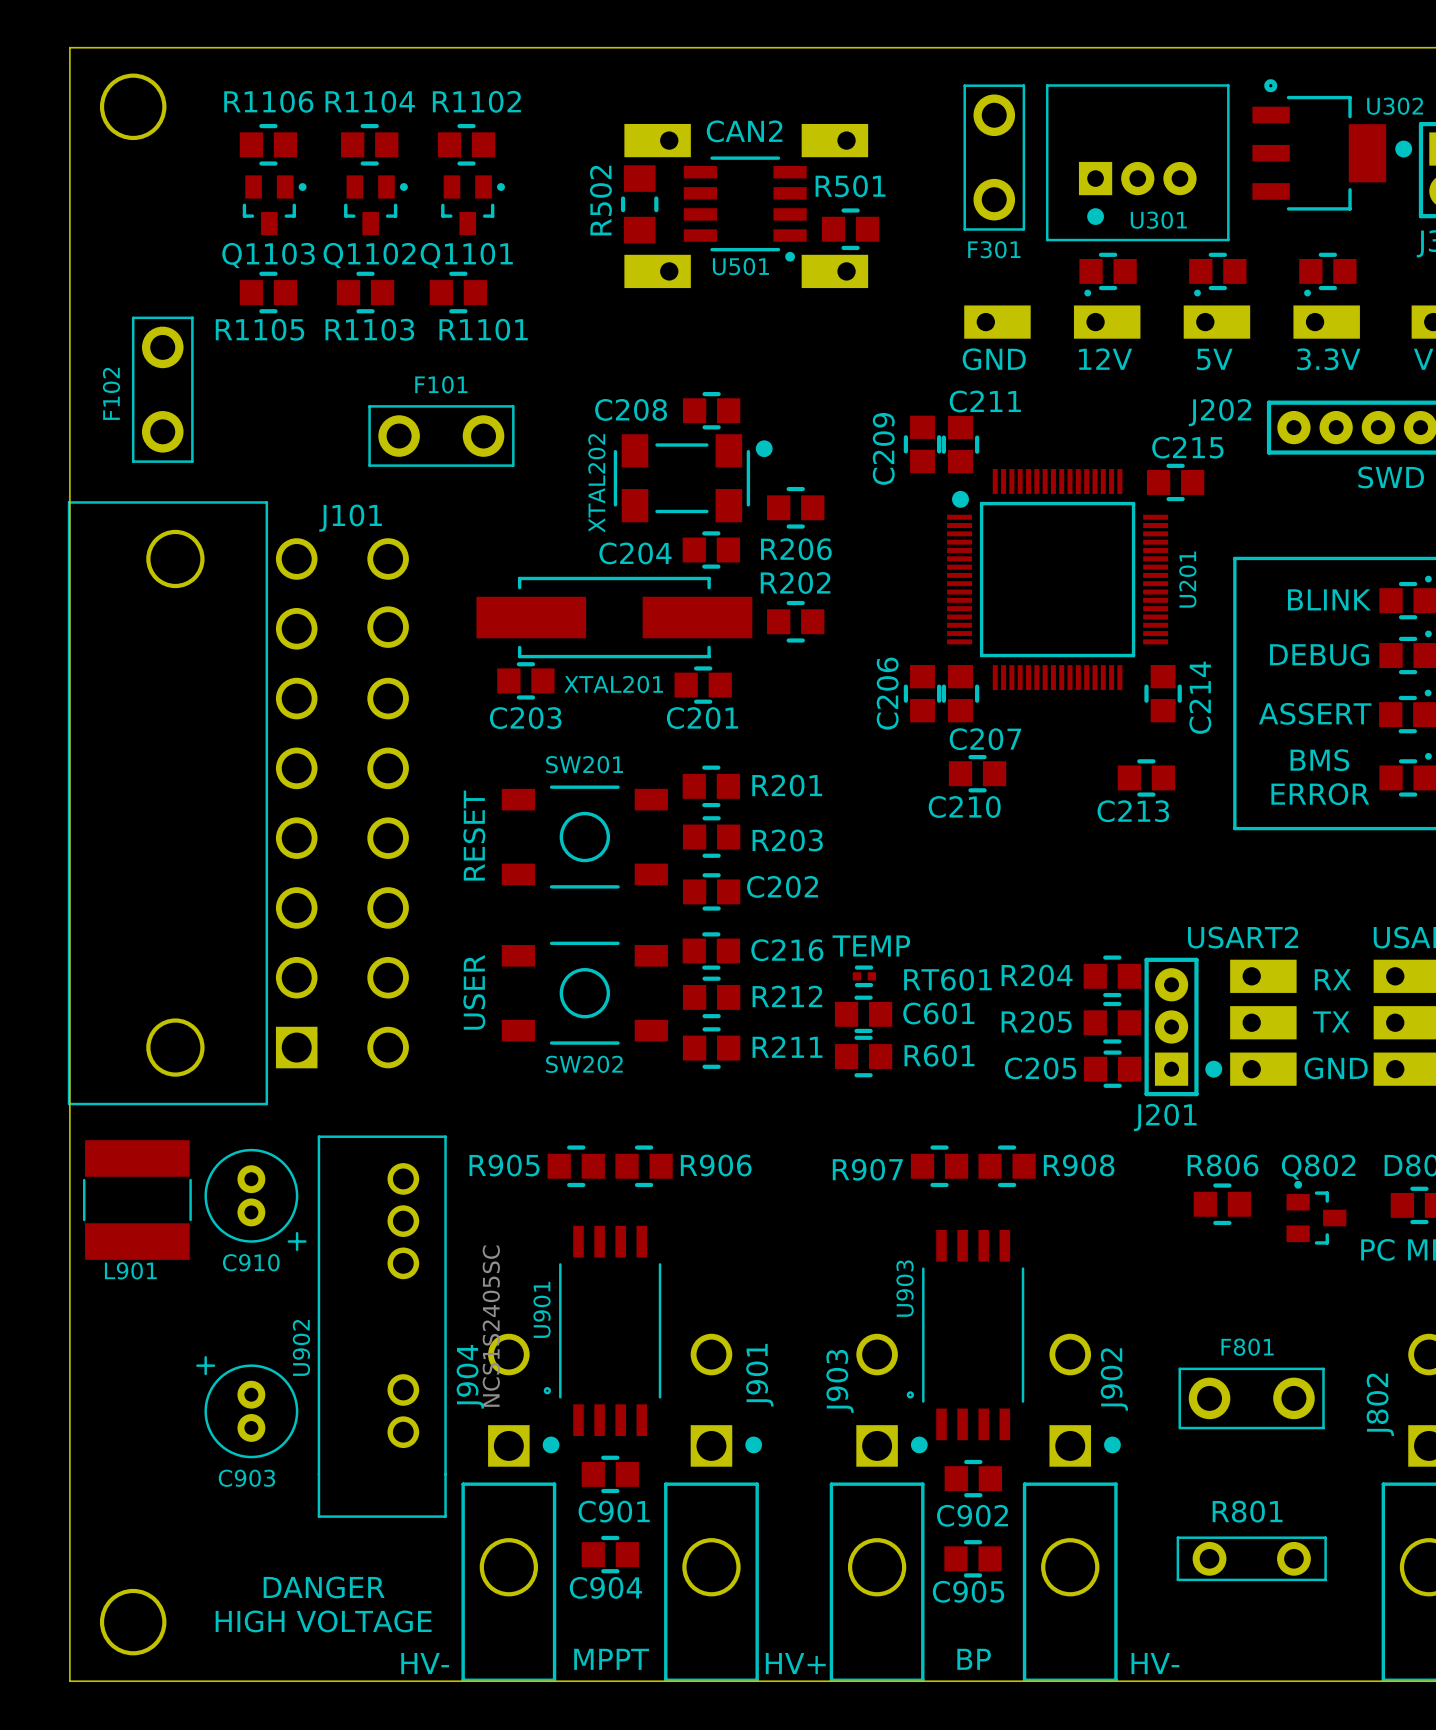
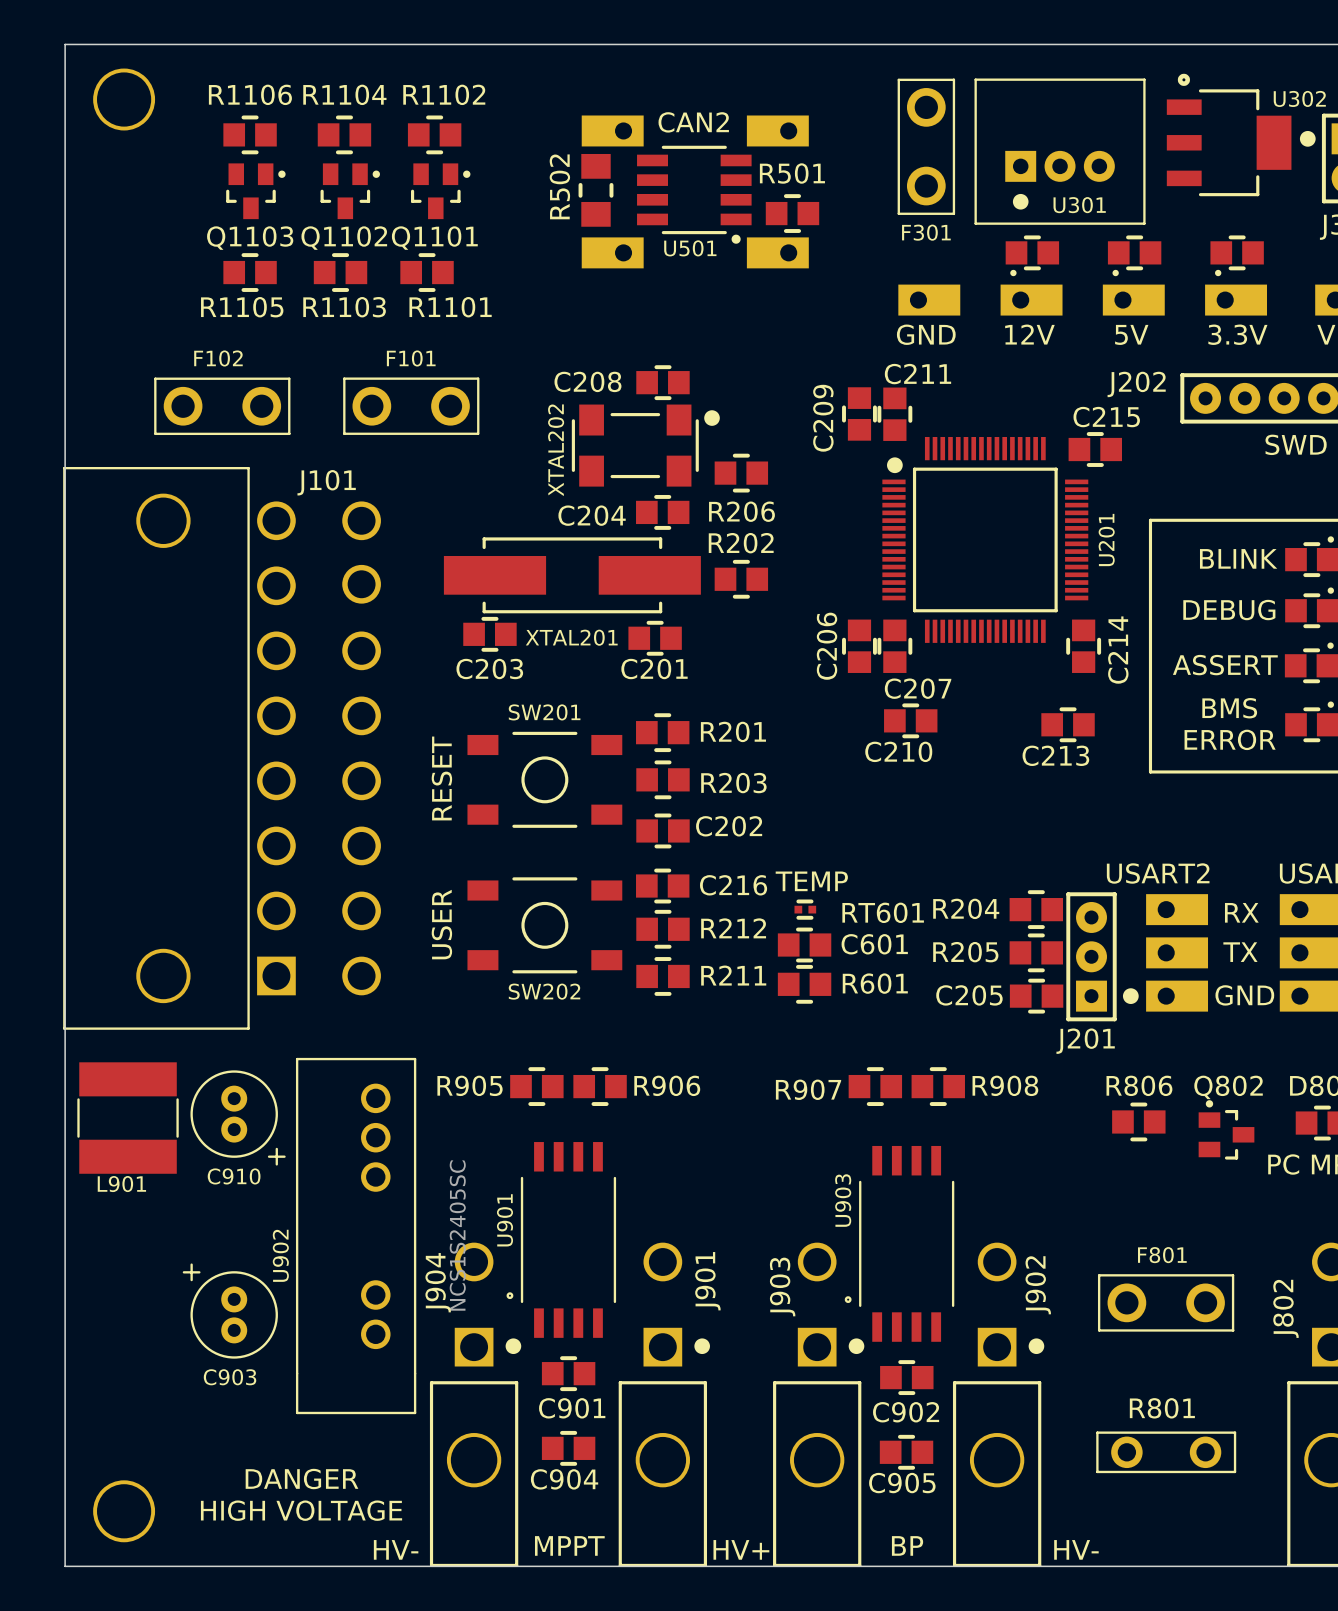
F102 rotation: 0° (162, 389) -> 90° clockwise (222, 406)
F102 position: (162, 389) -> (222, 406)

